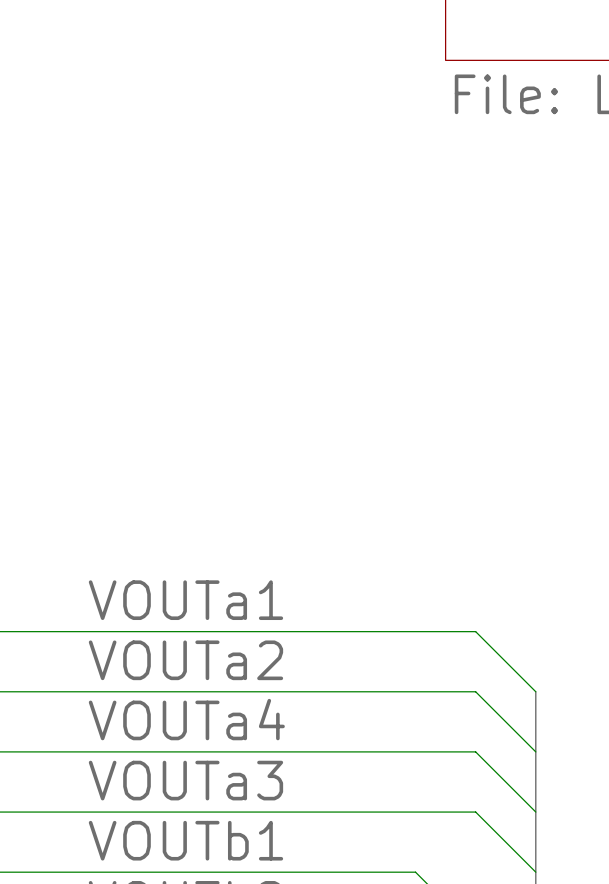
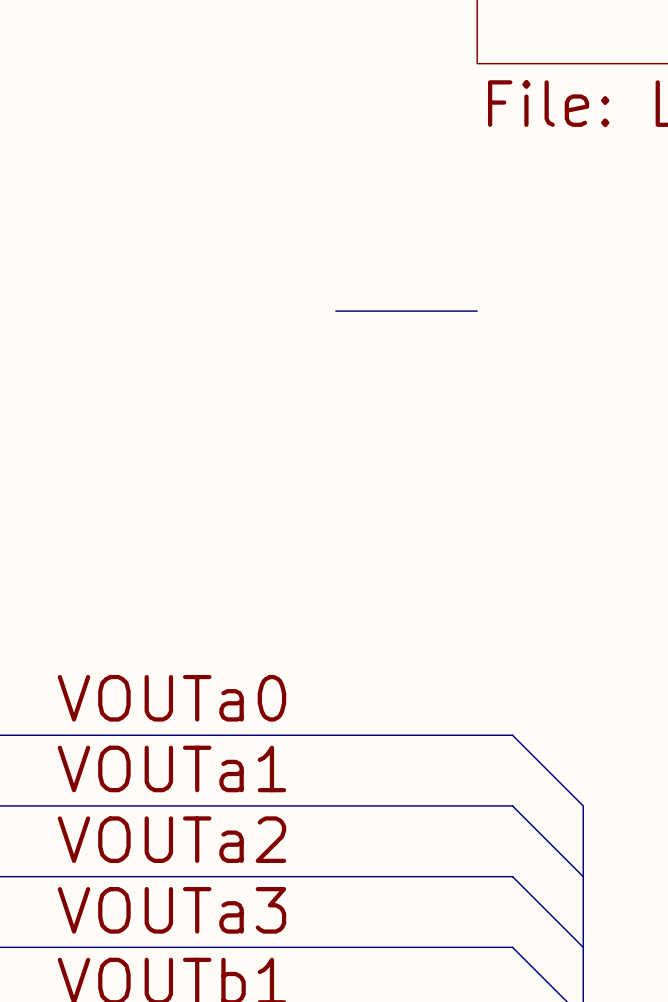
bus: none -> (335, 311) (477, 311)
label: VOUTa1 (185, 600) -> VOUTa0 (171, 698)
label: VOUTa2 (185, 660) -> VOUTa1 (171, 768)
label: VOUTa4 (186, 719) -> VOUTa2 (171, 839)

